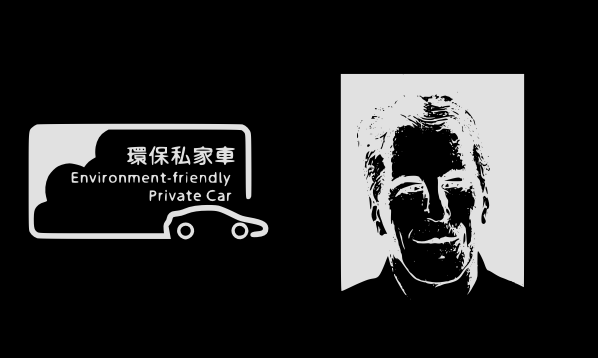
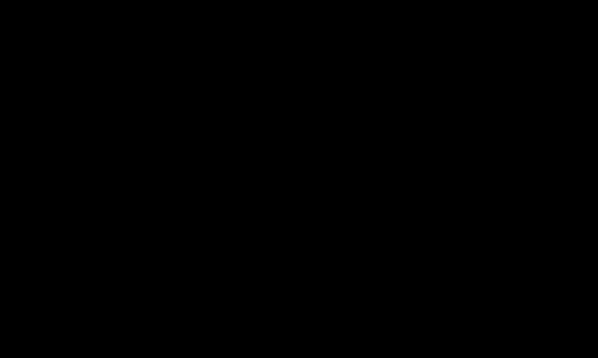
drawing: [340, 73, 525, 300] -> none
drawing: [28, 123, 269, 240] -> none

